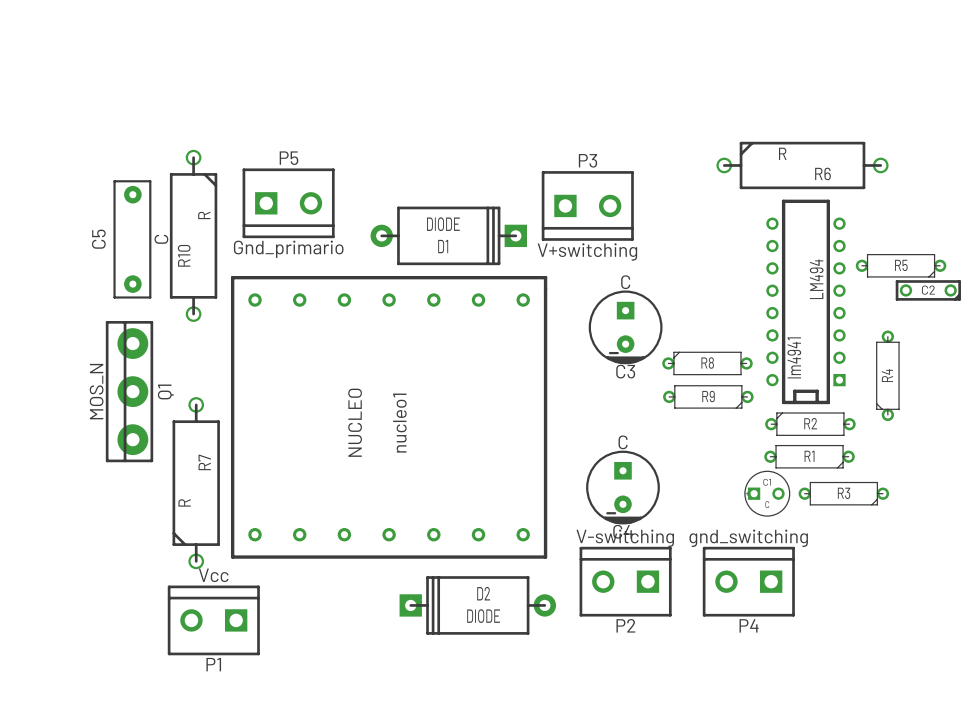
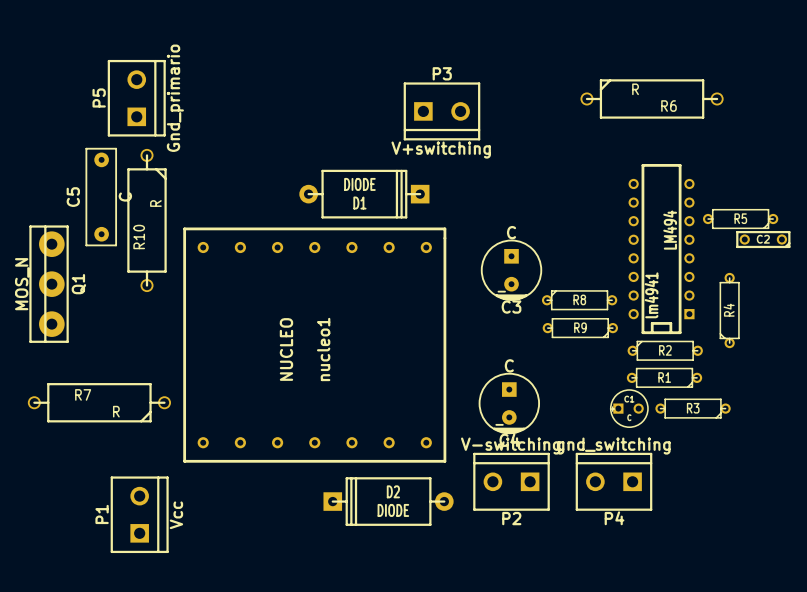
R6 position: (802, 165) -> (652, 98)
P5 rotation: 0° (288, 203) -> 90° counterclockwise (136, 98)
P5 position: (288, 203) -> (136, 98)
P3 position: (587, 205) -> (441, 111)
R10 position: (193, 235) -> (147, 220)
Q1 position: (129, 391) -> (49, 284)
R7 rotation: 0° (196, 483) -> 90° counterclockwise (99, 402)
P1 rotation: 0° (213, 620) -> 90° clockwise (139, 514)

